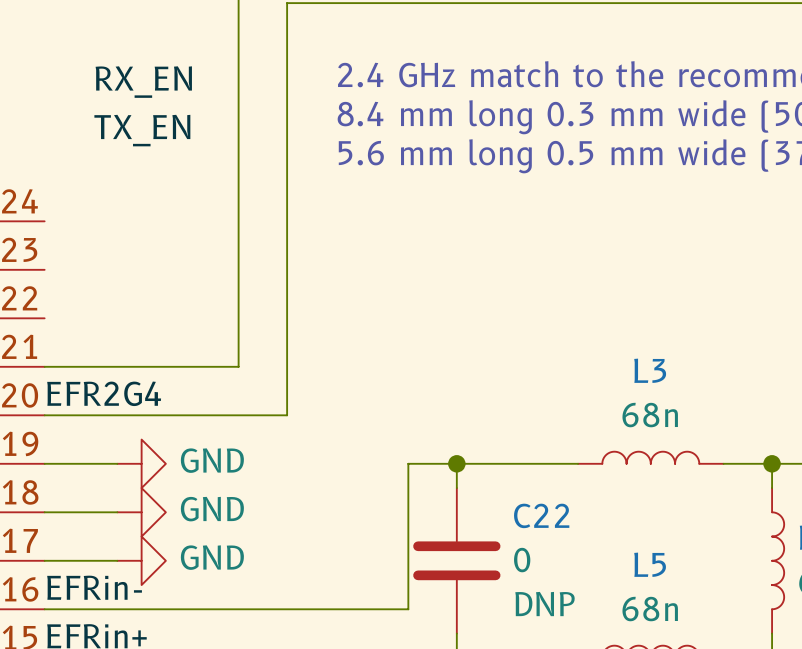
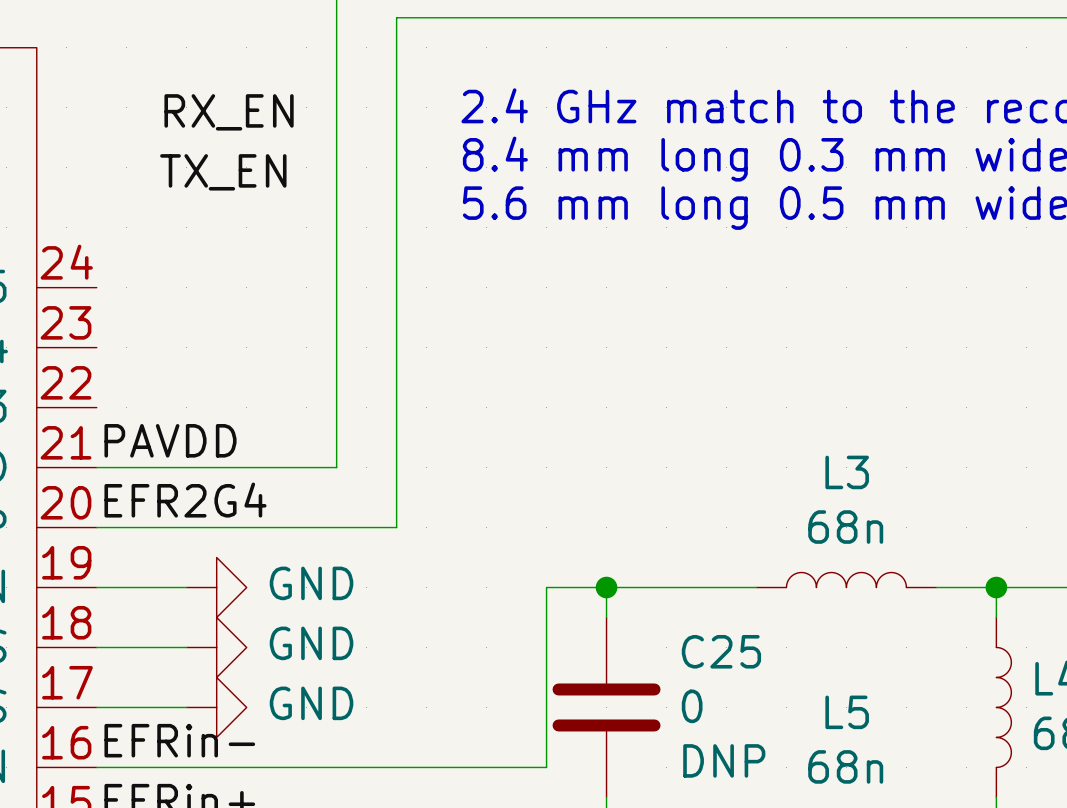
label: none -> PAVDD (170, 440)
C22 name: C22 (541, 515) -> C25 (721, 651)

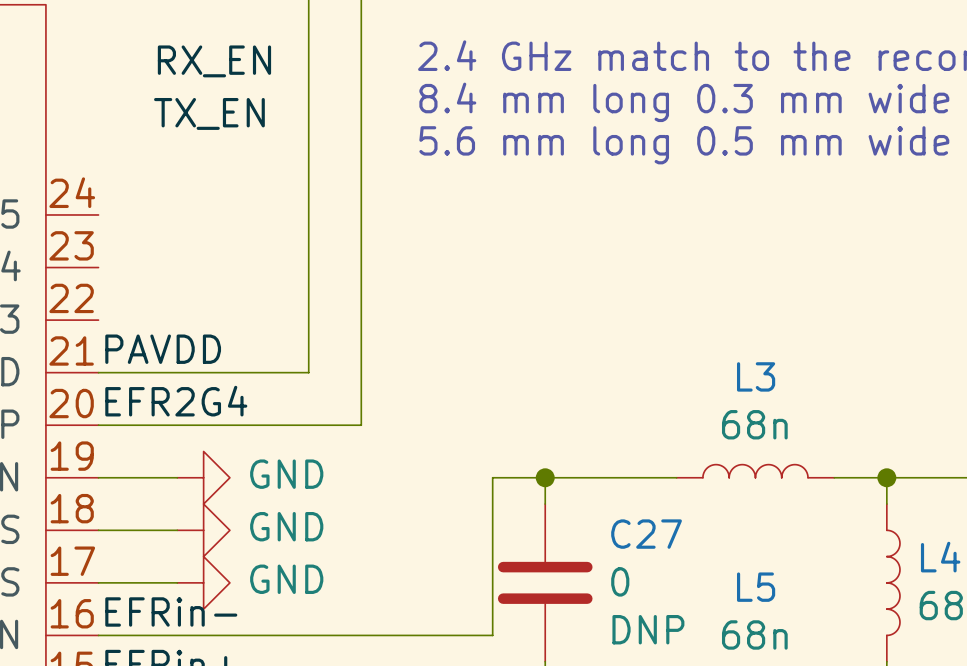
C25 name: C25 (721, 651) -> C27 (646, 534)

